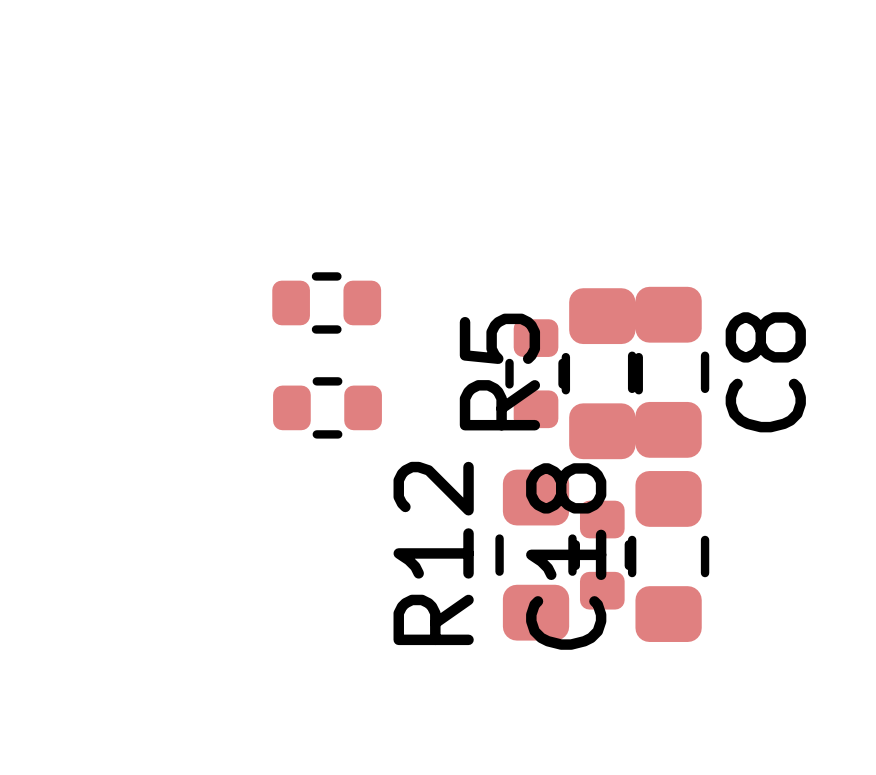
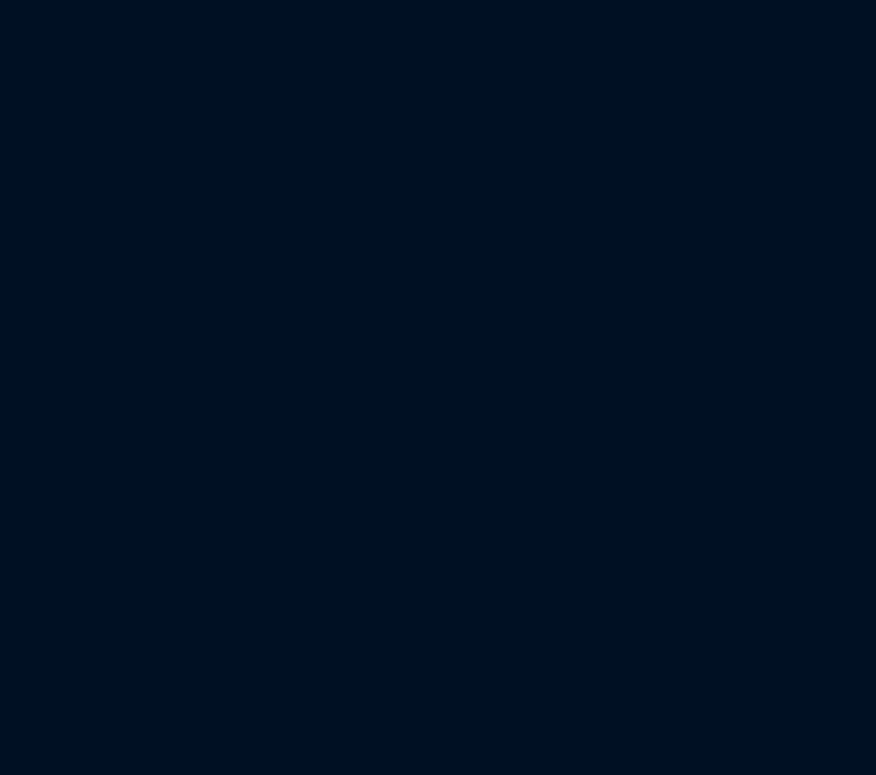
part: (326, 302) -> none
C8: (668, 372) -> none
part: (536, 373) -> none
R5: (602, 373) -> none
part: (327, 407) -> none
R12: (536, 555) -> none
part: (602, 555) -> none
C18: (668, 556) -> none

